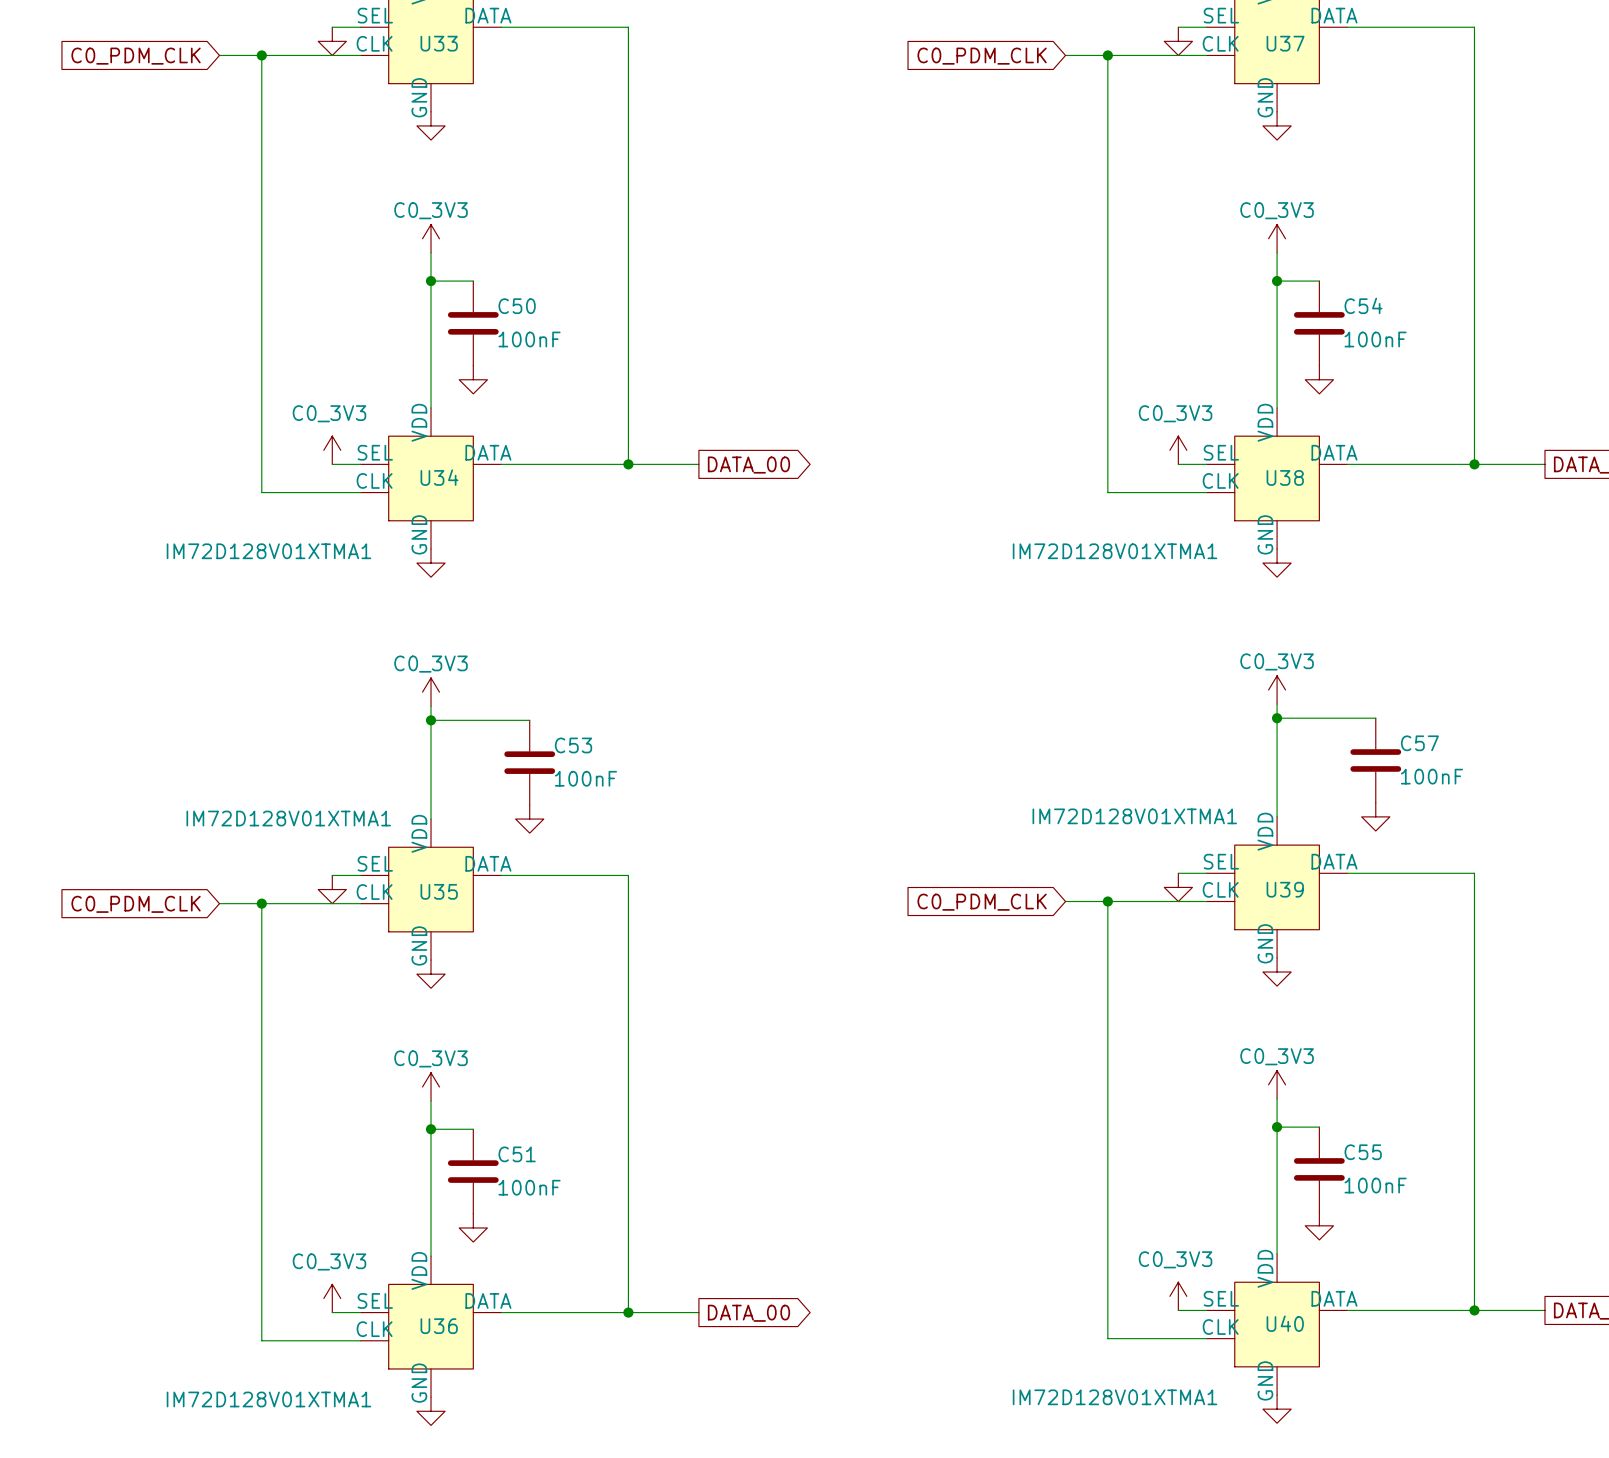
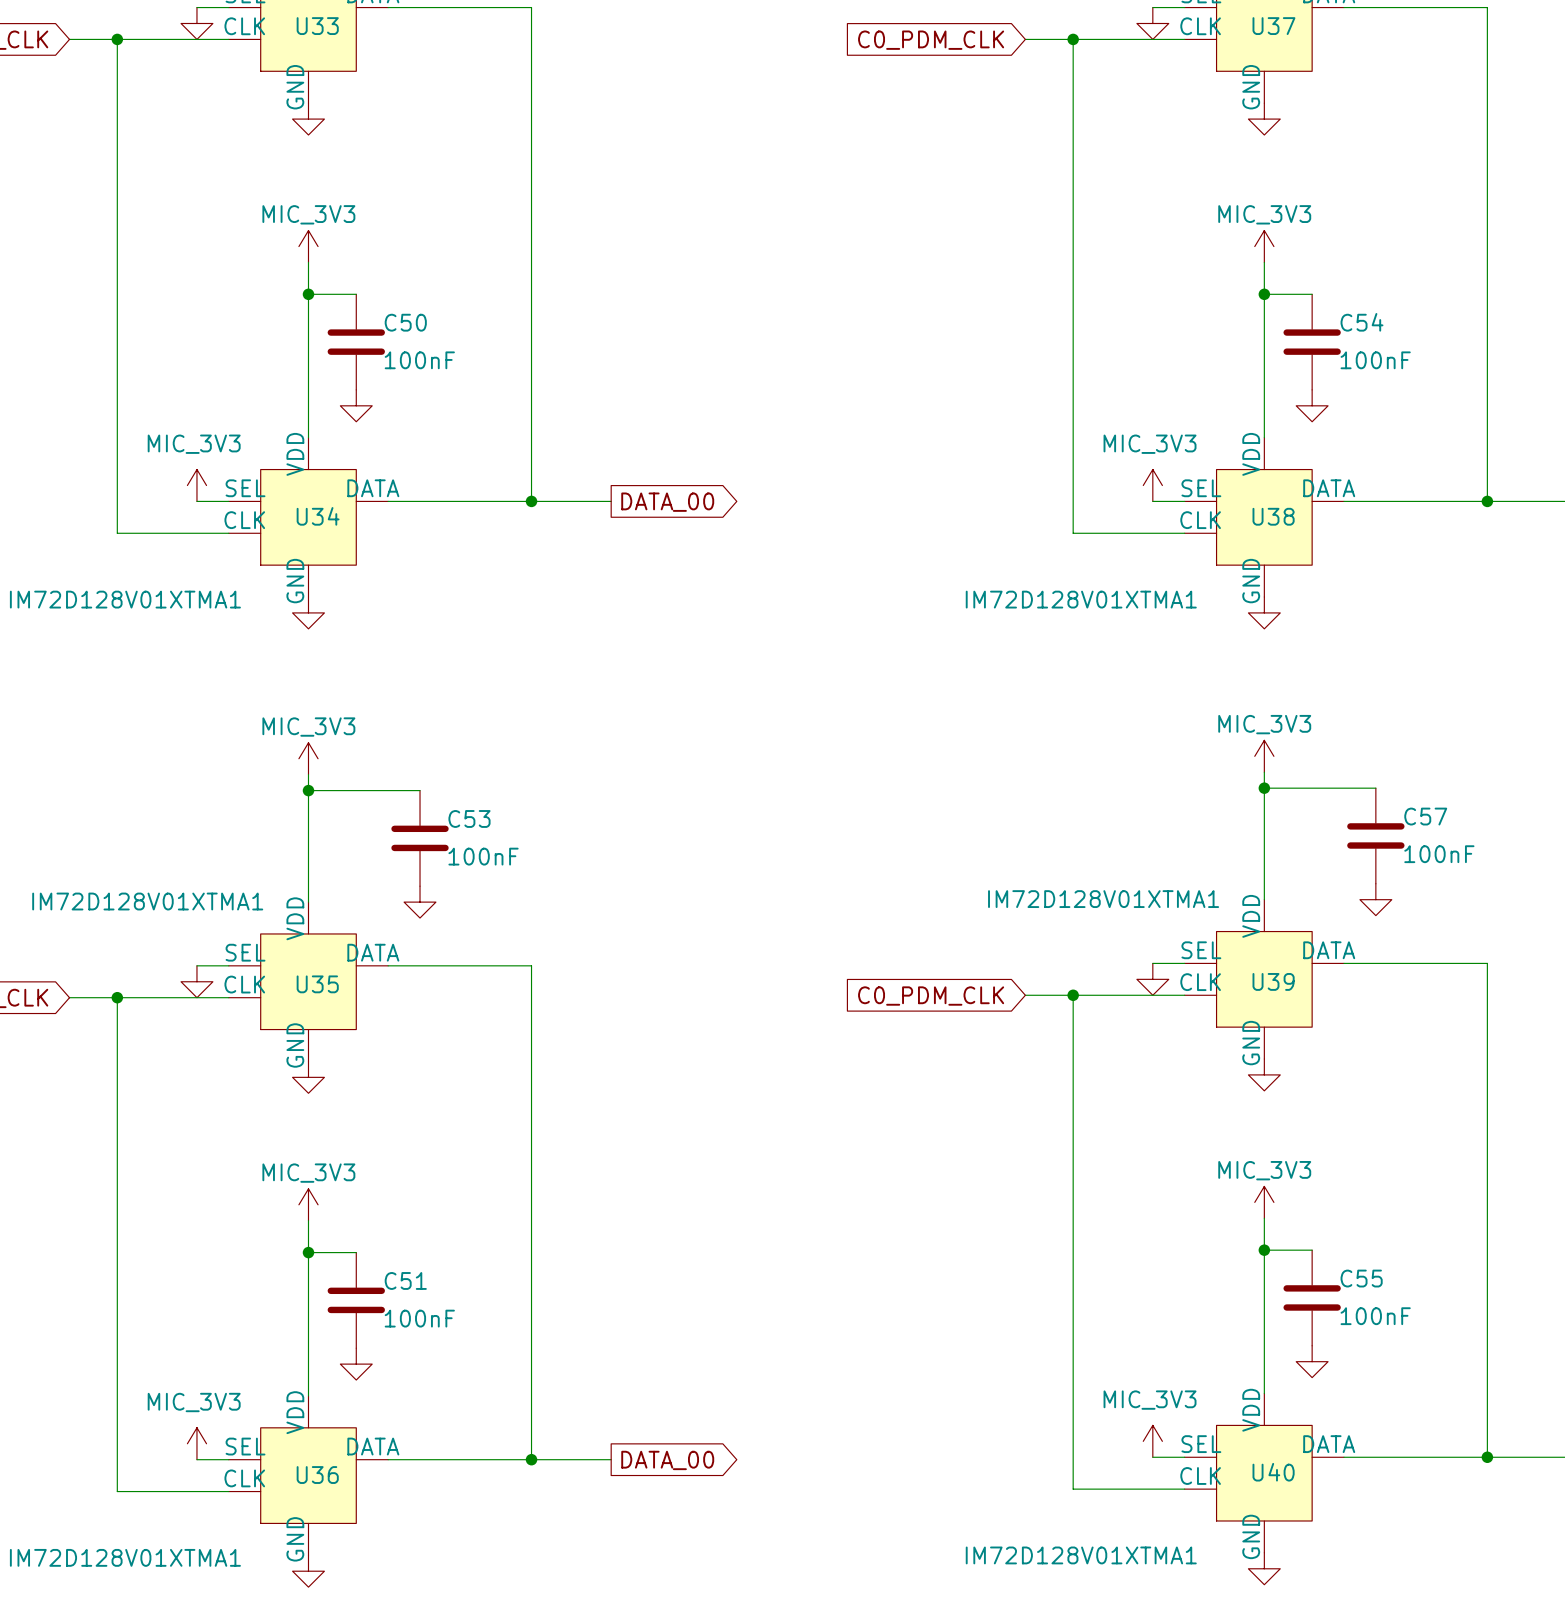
power symbol: C0_3V3 (431, 238) -> MIC_3V3 (308, 246)
power symbol: C0_3V3 (1277, 238) -> MIC_3V3 (1264, 246)
power symbol: C0_3V3 (332, 450) -> MIC_3V3 (196, 485)
power symbol: C0_3V3 (1178, 450) -> MIC_3V3 (1152, 485)
power symbol: C0_3V3 (1277, 689) -> MIC_3V3 (1264, 756)
power symbol: C0_3V3 (431, 692) -> MIC_3V3 (308, 758)
power symbol: C0_3V3 (1277, 1084) -> MIC_3V3 (1264, 1202)
power symbol: C0_3V3 (431, 1086) -> MIC_3V3 (308, 1204)
power symbol: C0_3V3 (1178, 1296) -> MIC_3V3 (1152, 1441)
power symbol: C0_3V3 (332, 1298) -> MIC_3V3 (196, 1443)

